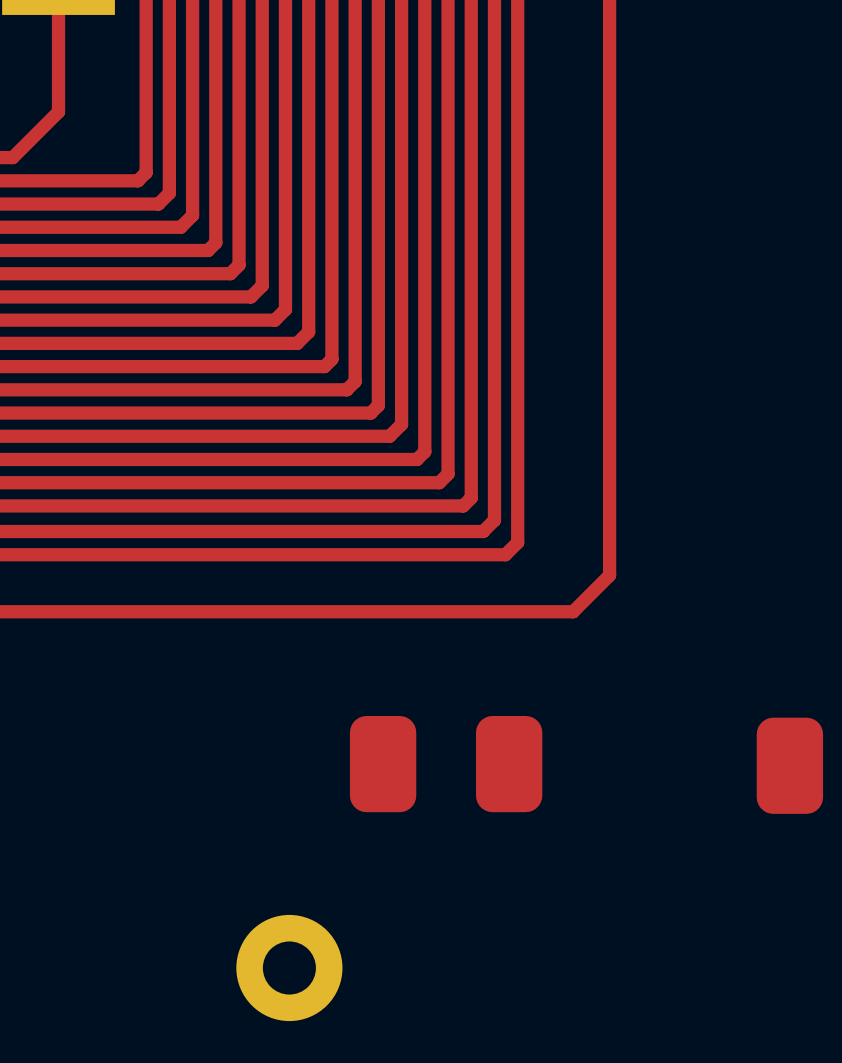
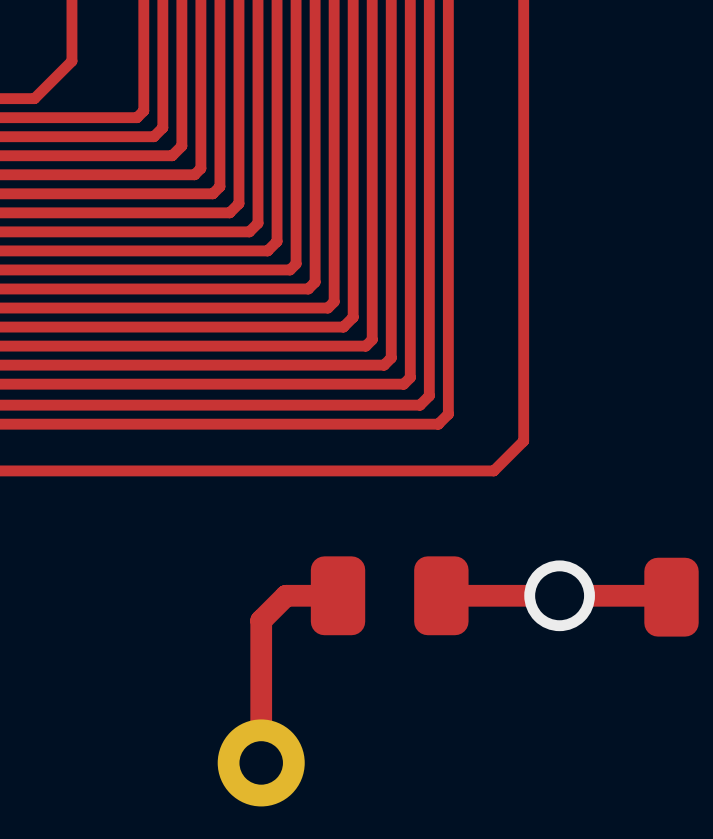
top track: none -> (338, 595) (286, 595) (261, 620) (261, 762)
via: none -> (559, 595)
top track: none -> (671, 595) (441, 595)

